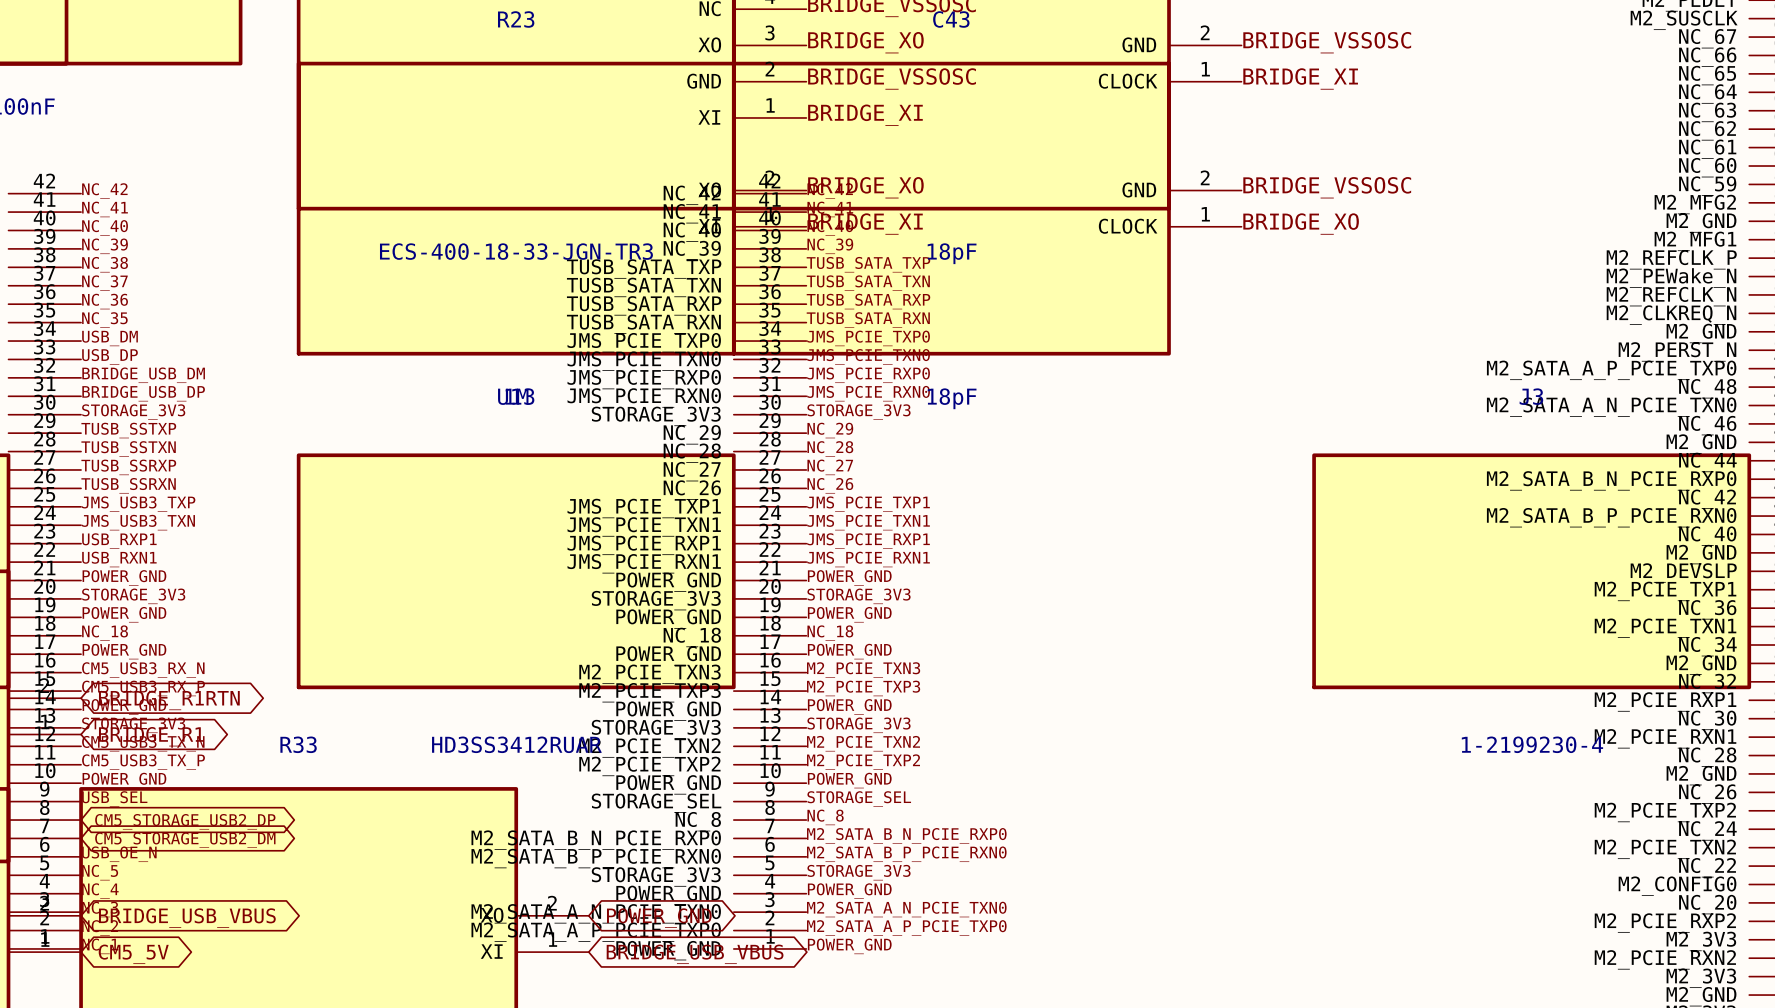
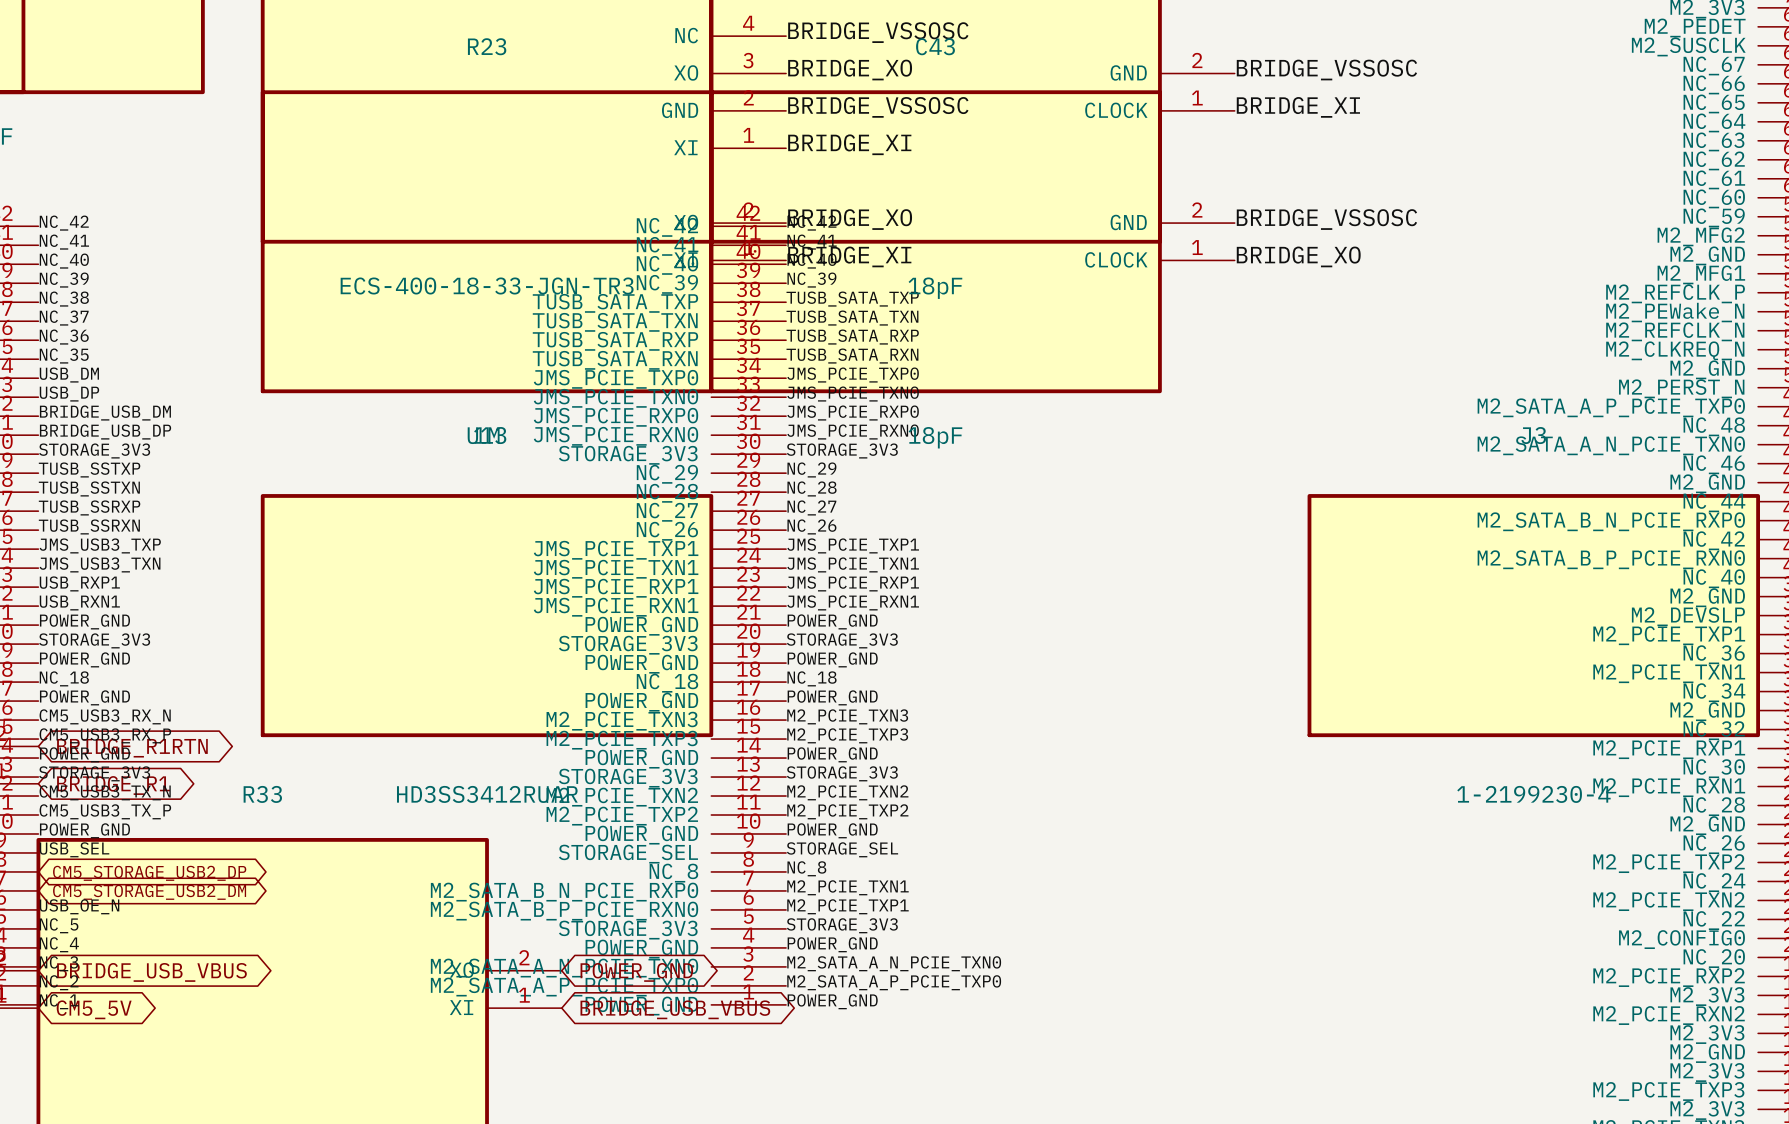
label: M2_SATA_B_N_PCIE_RXP0 (906, 835) -> M2_PCIE_TXN1 (847, 887)
label: M2_SATA_B_P_PCIE_RXN0 (906, 854) -> M2_PCIE_TXP1 (847, 906)

